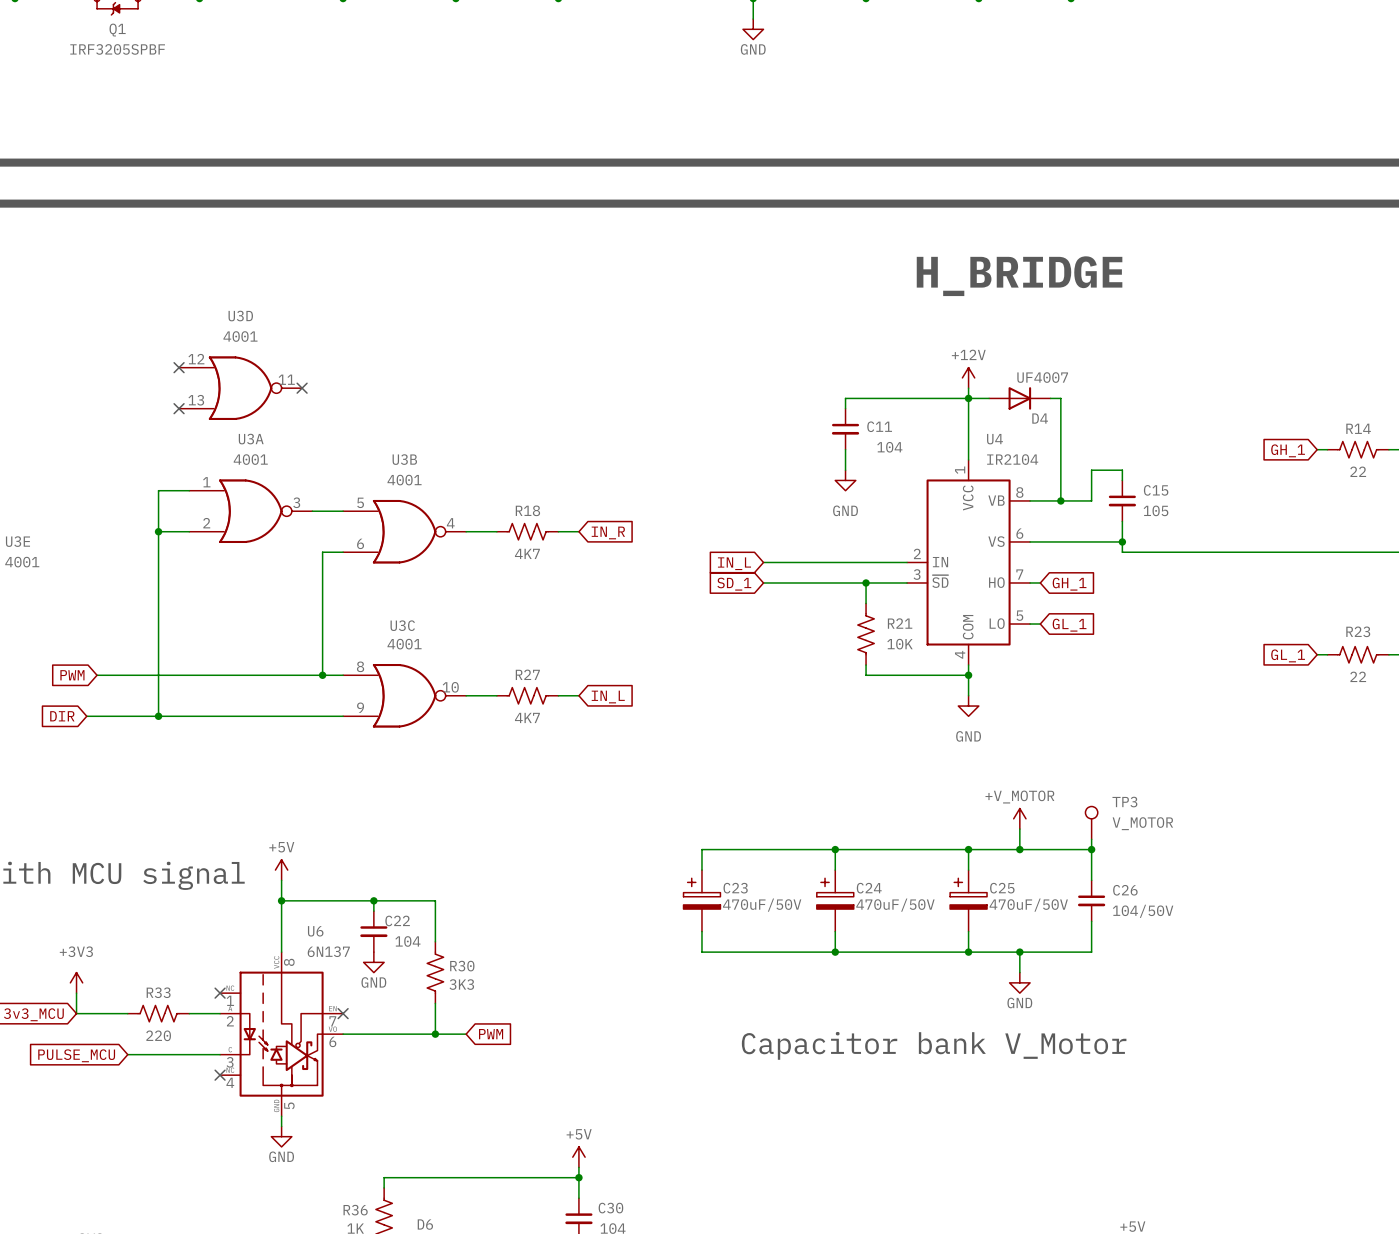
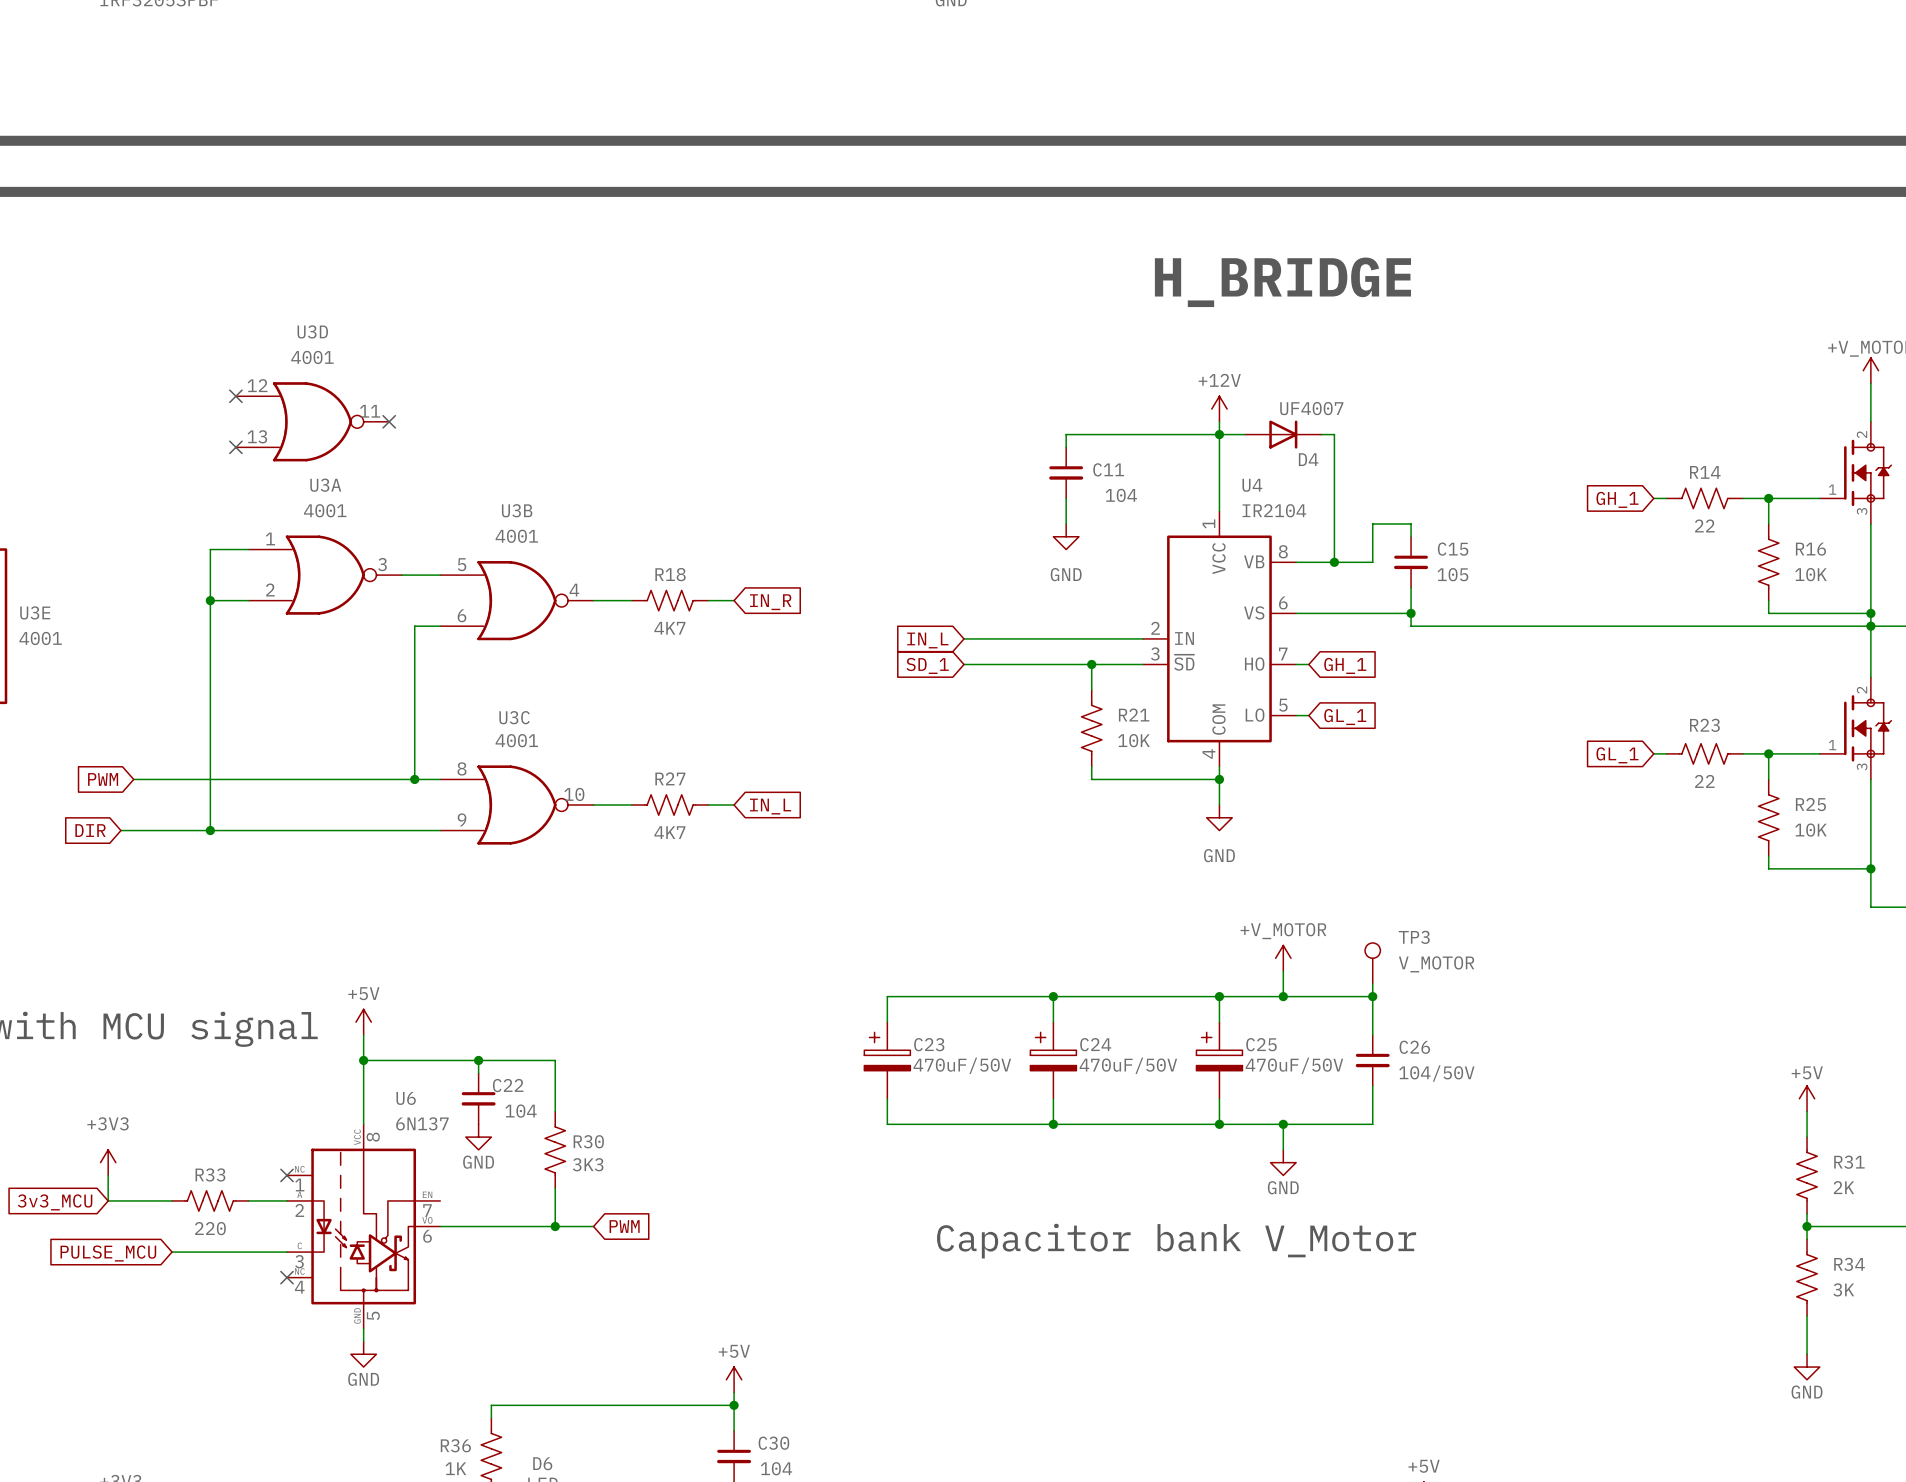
no-connect mark: (343, 1013) -> none

